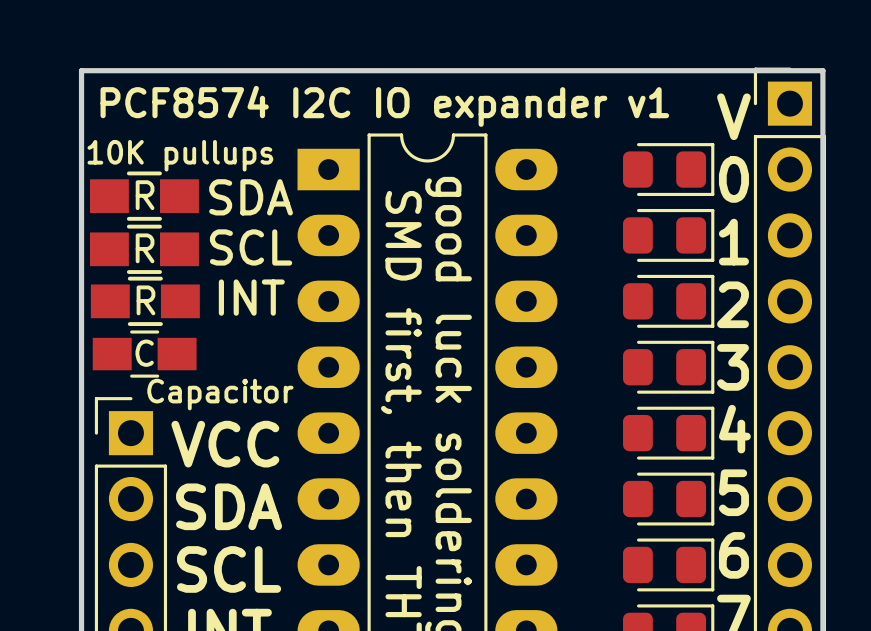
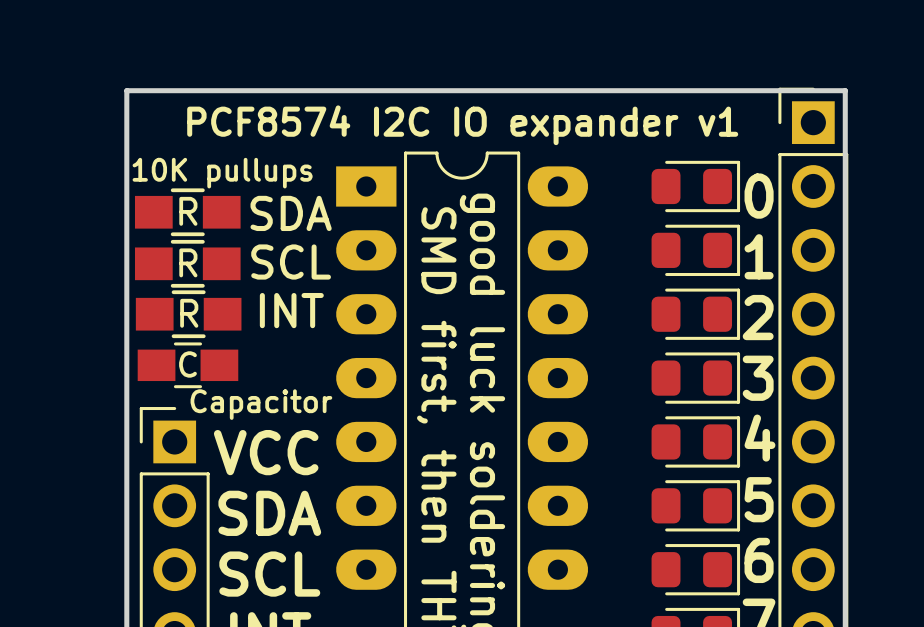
text position: PCF8574 I2C IO expander v1 (384, 106) -> PCF8574 I2C IO expander v1 (462, 125)
text: V (733, 116) -> none

